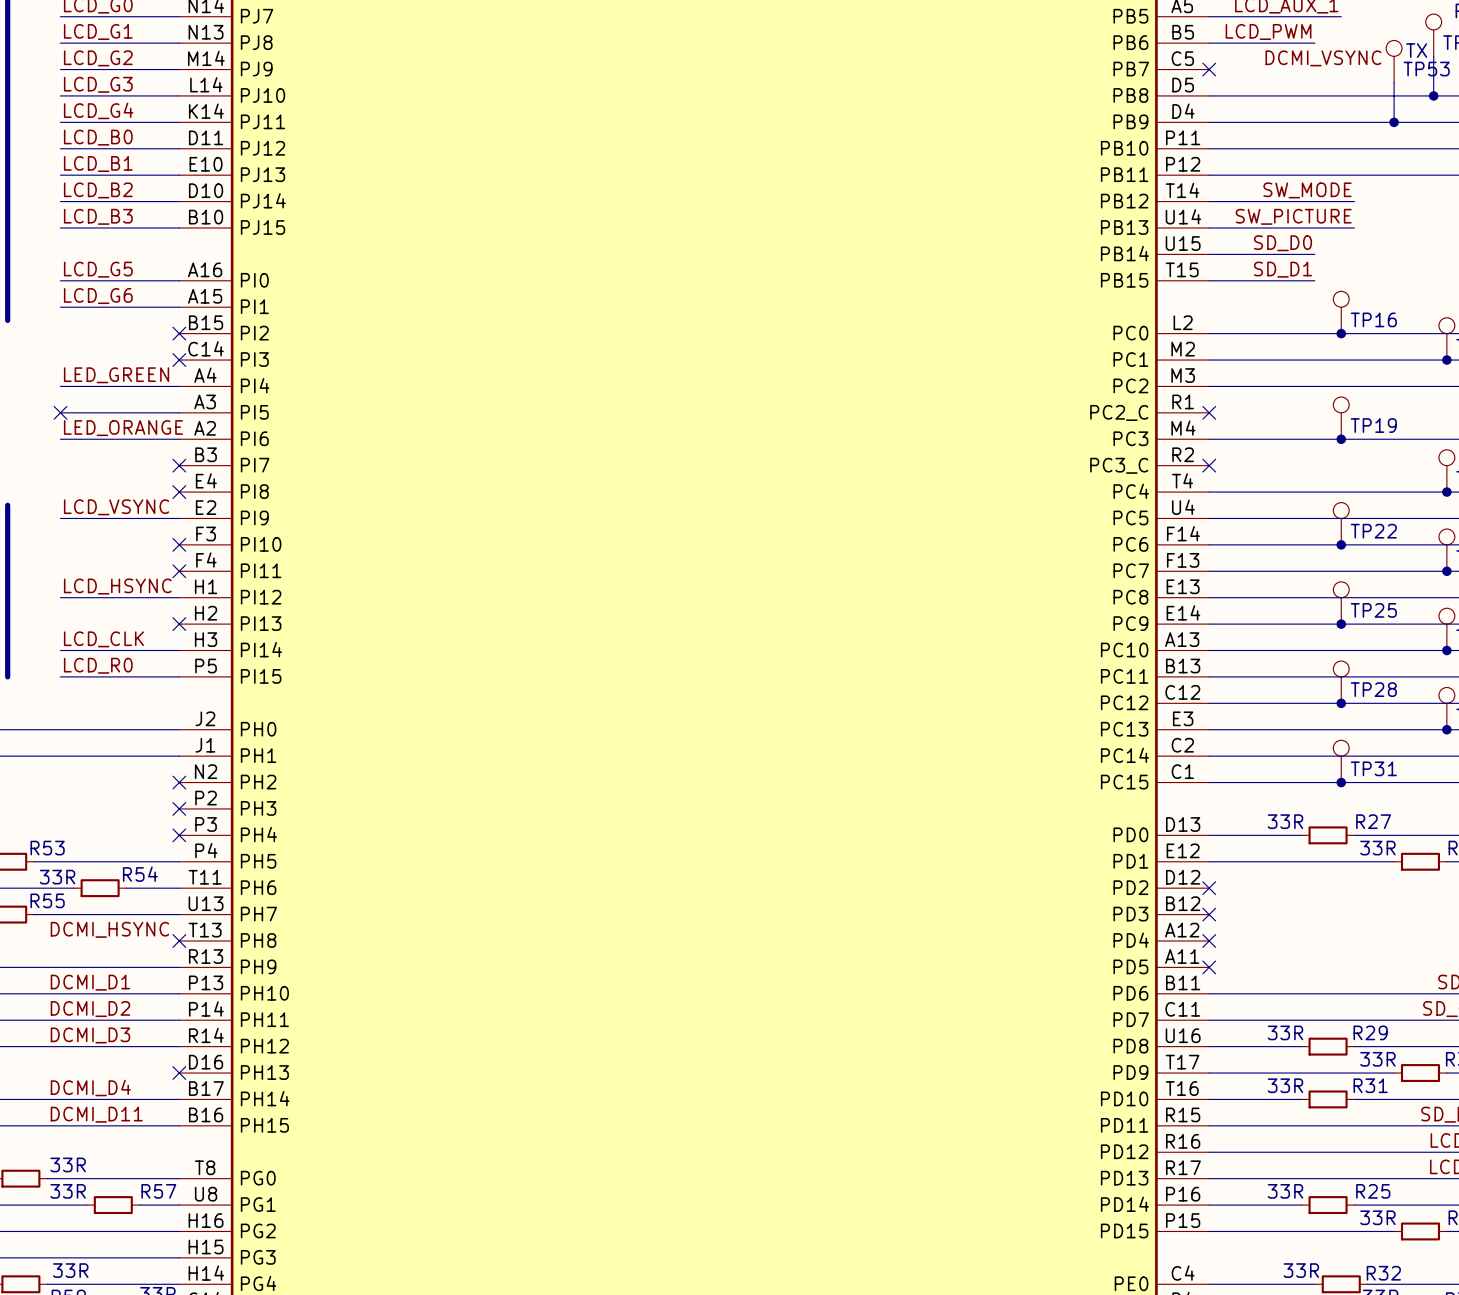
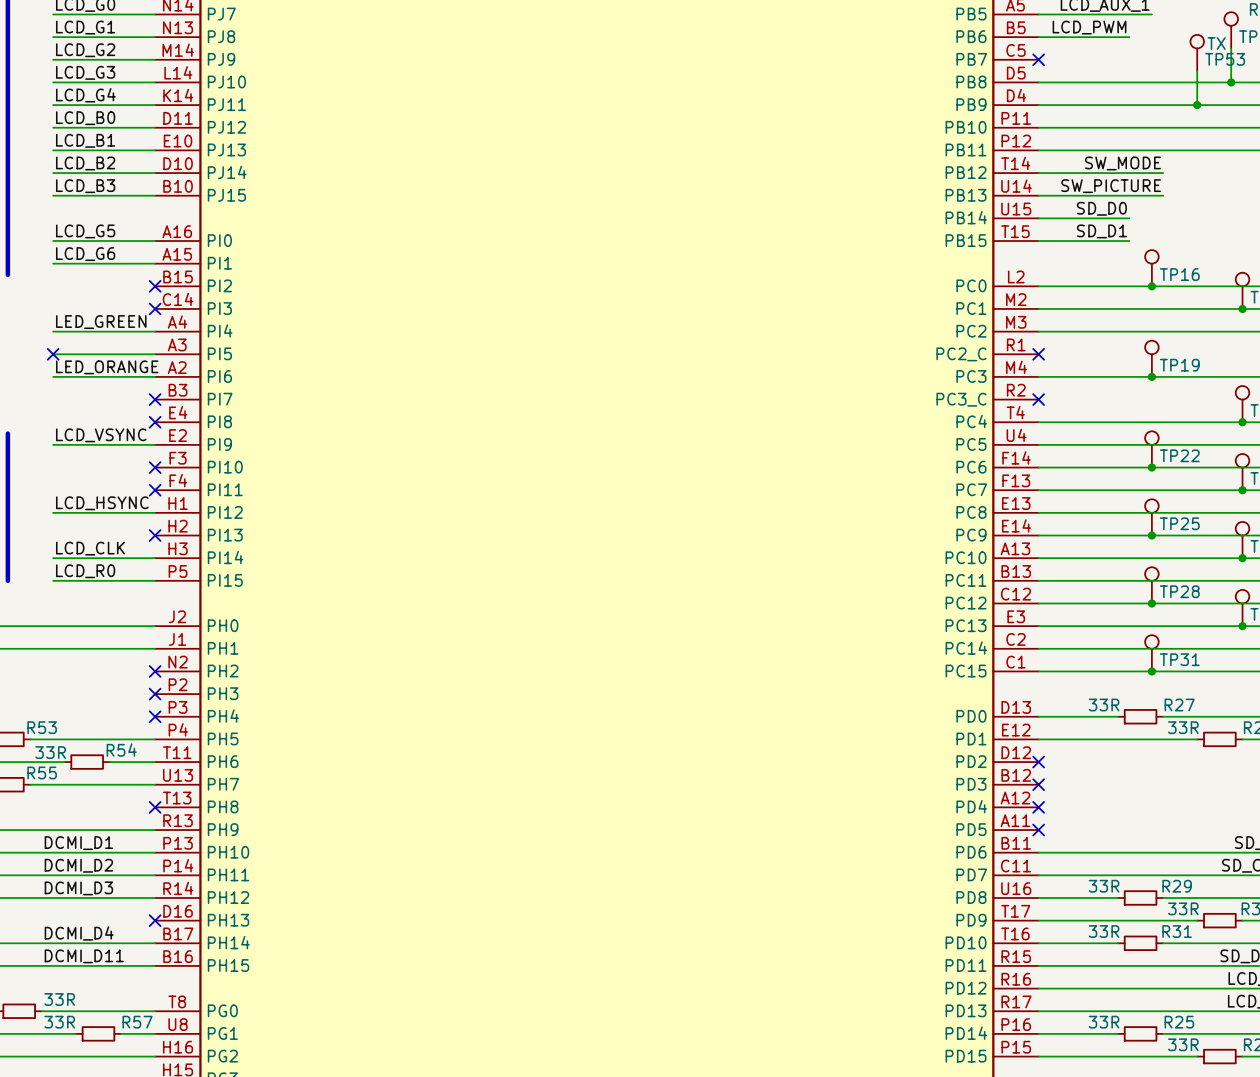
label: DCMI_VSYNC (1323, 58) -> none
label: DCMI_HSYNC (109, 929) -> none

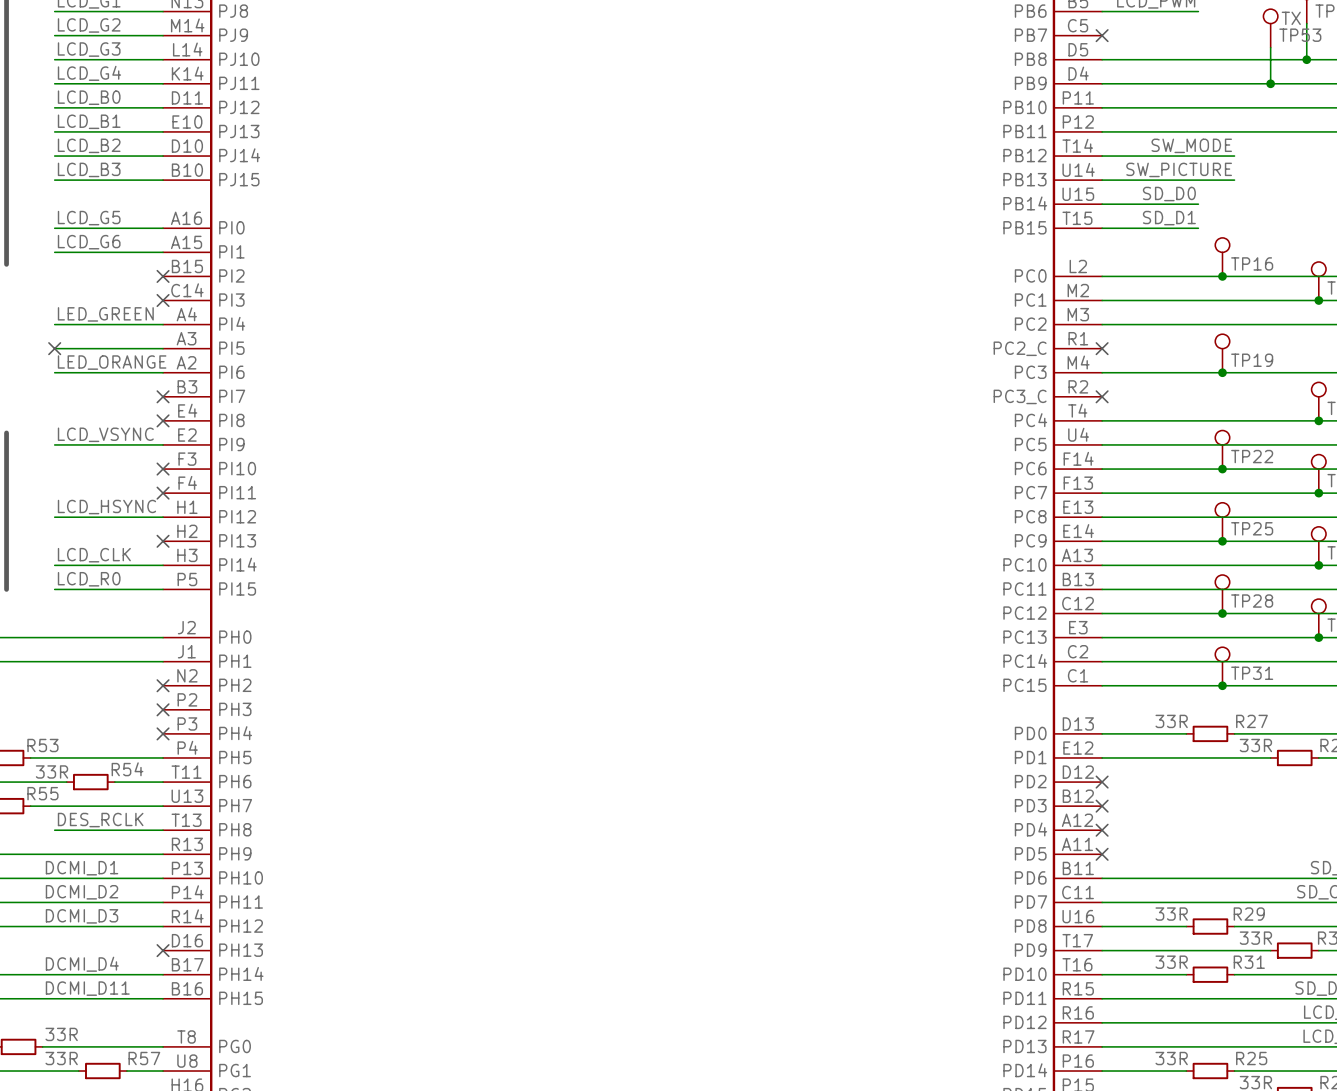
label: none -> DES_RCLK (100, 820)
wire: none -> (54, 830) (163, 830)
no-connect mark: (155, 807) -> none

